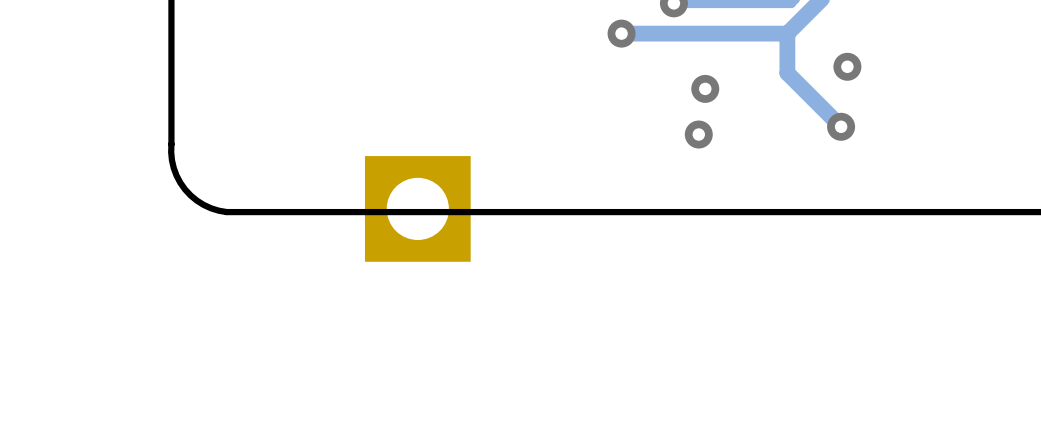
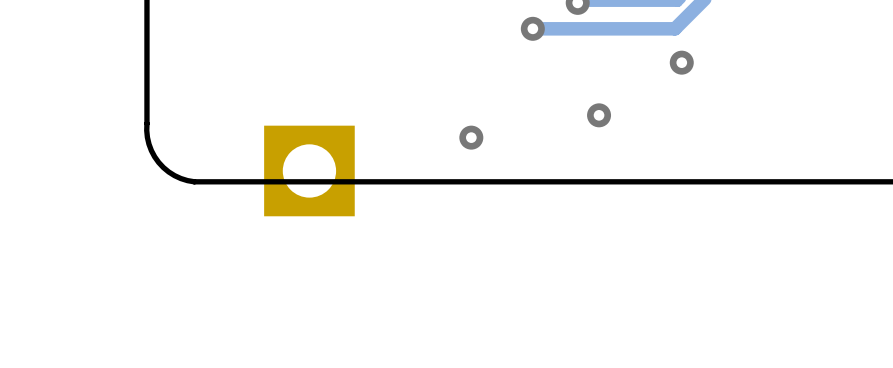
track: (787, 33) (787, 73) (841, 126) -> none
via: (847, 66) -> none
via: none -> (681, 62)
via: (705, 88) -> none
via: (841, 126) -> none
via: none -> (471, 137)
part position: (417, 208) -> (309, 170)

